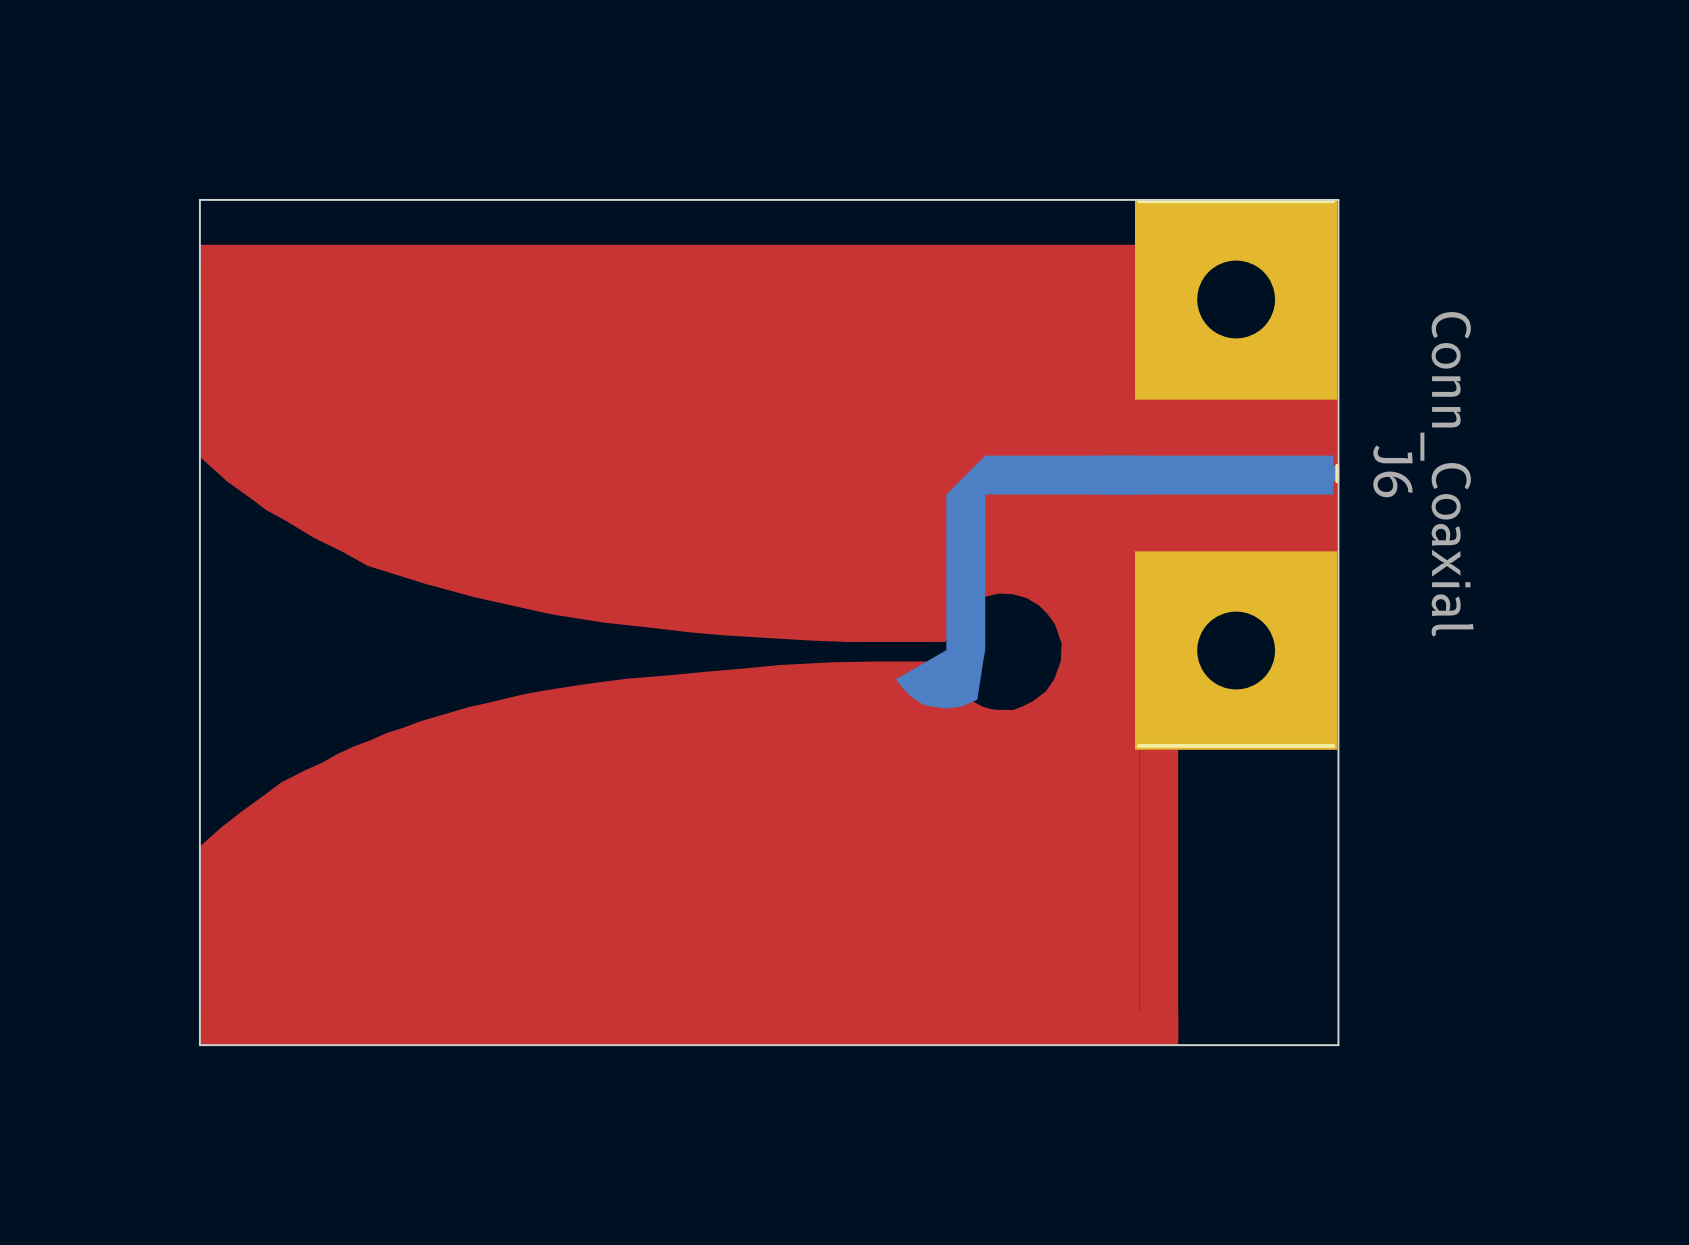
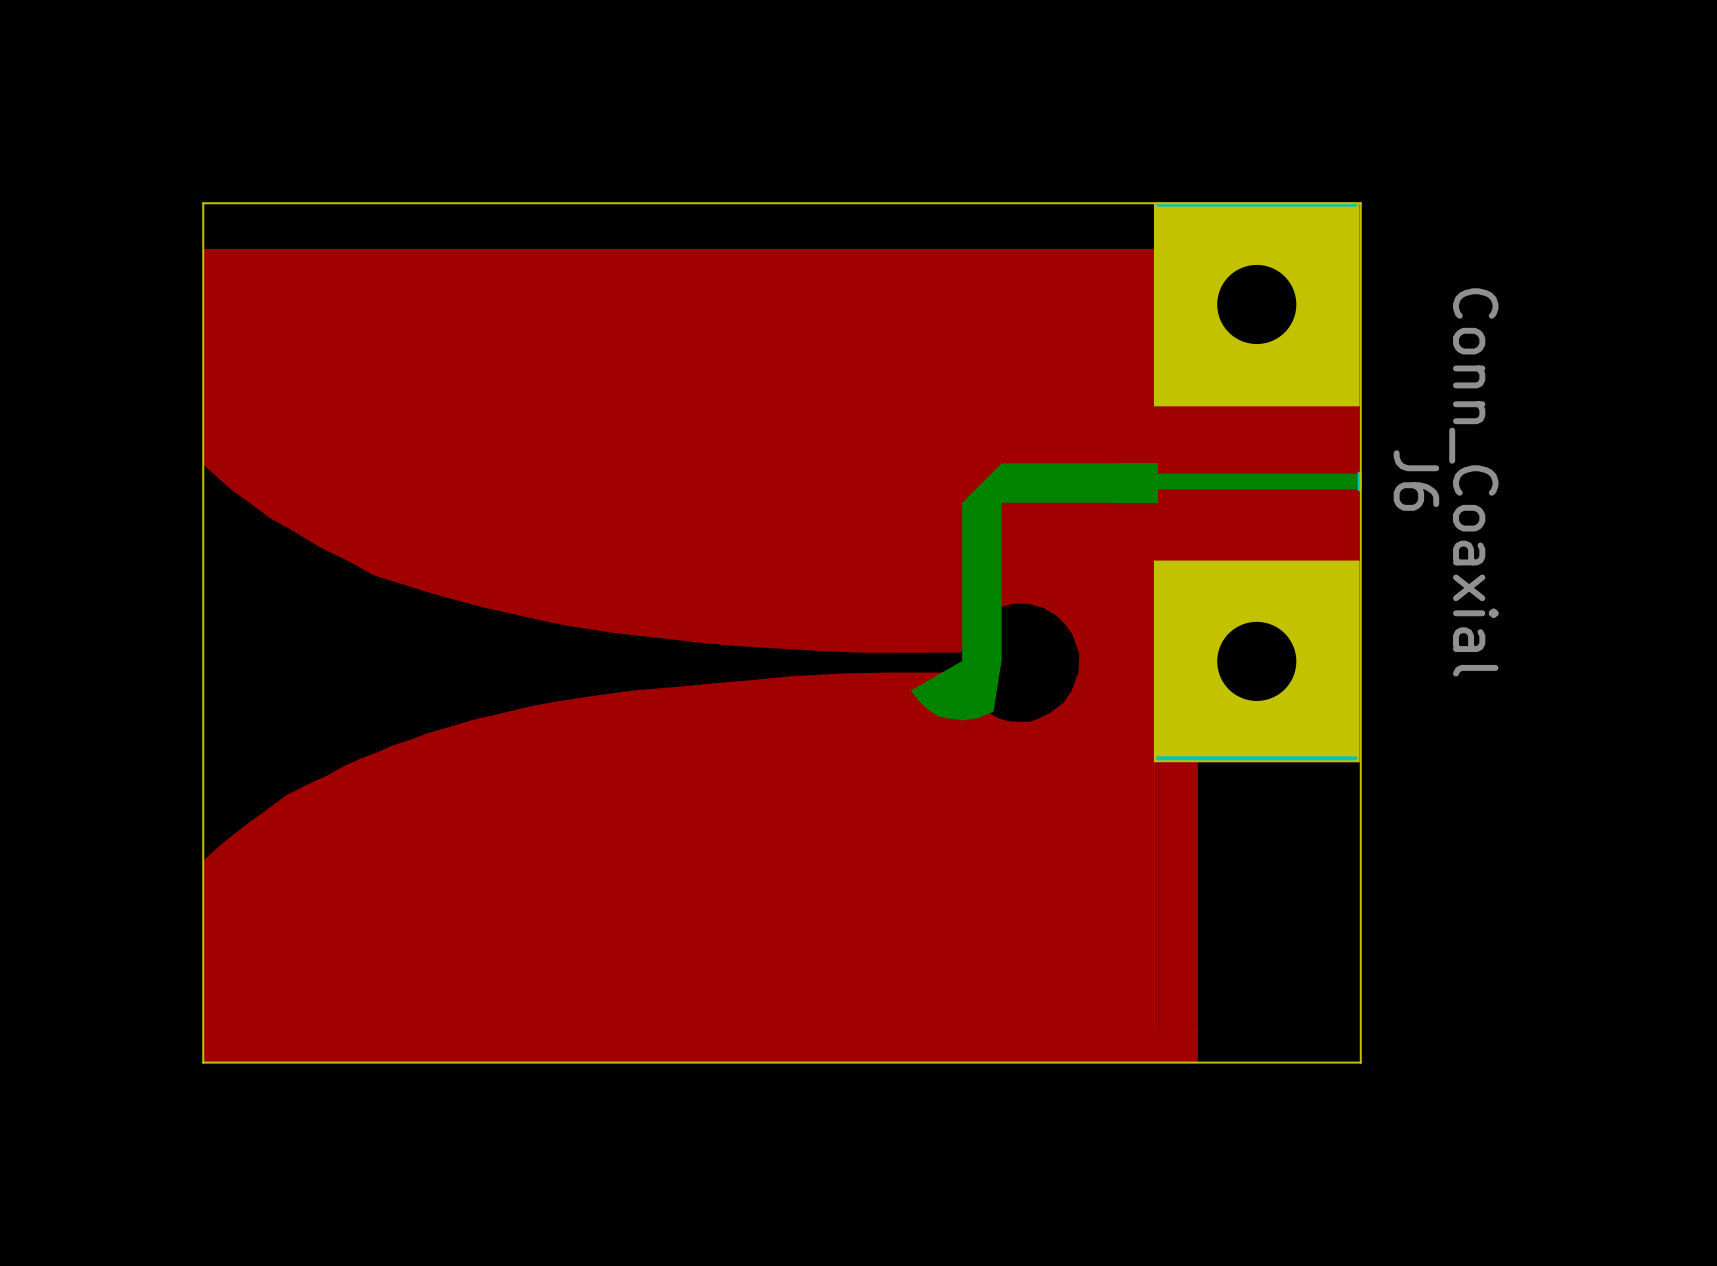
drawing: [1138, 455, 1334, 495] -> none

